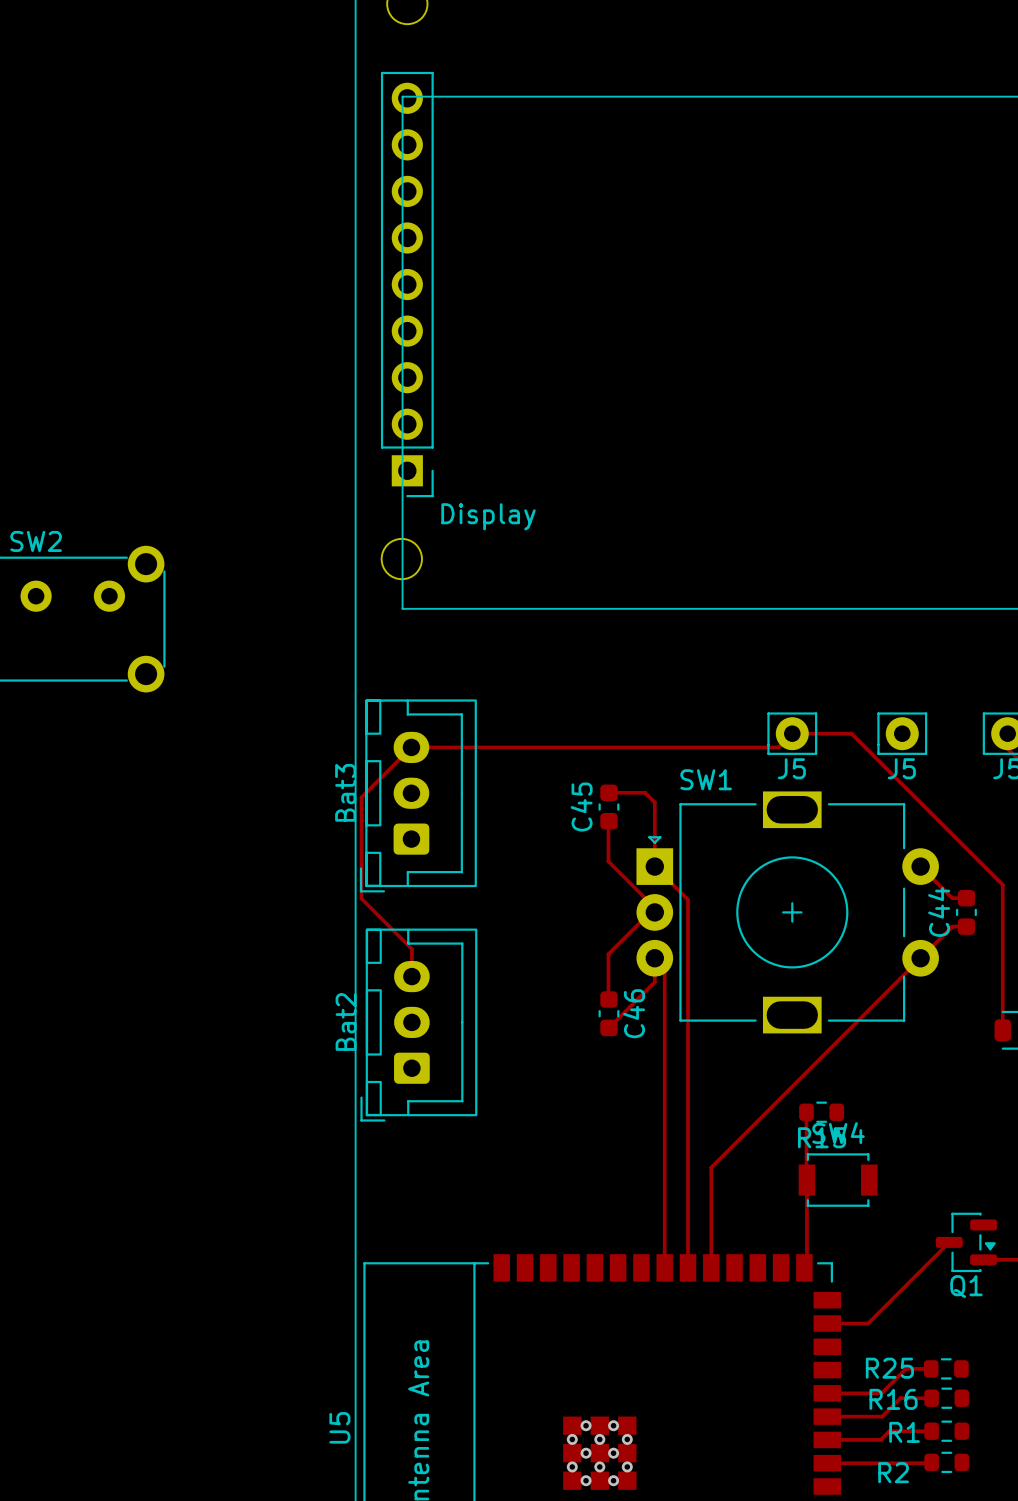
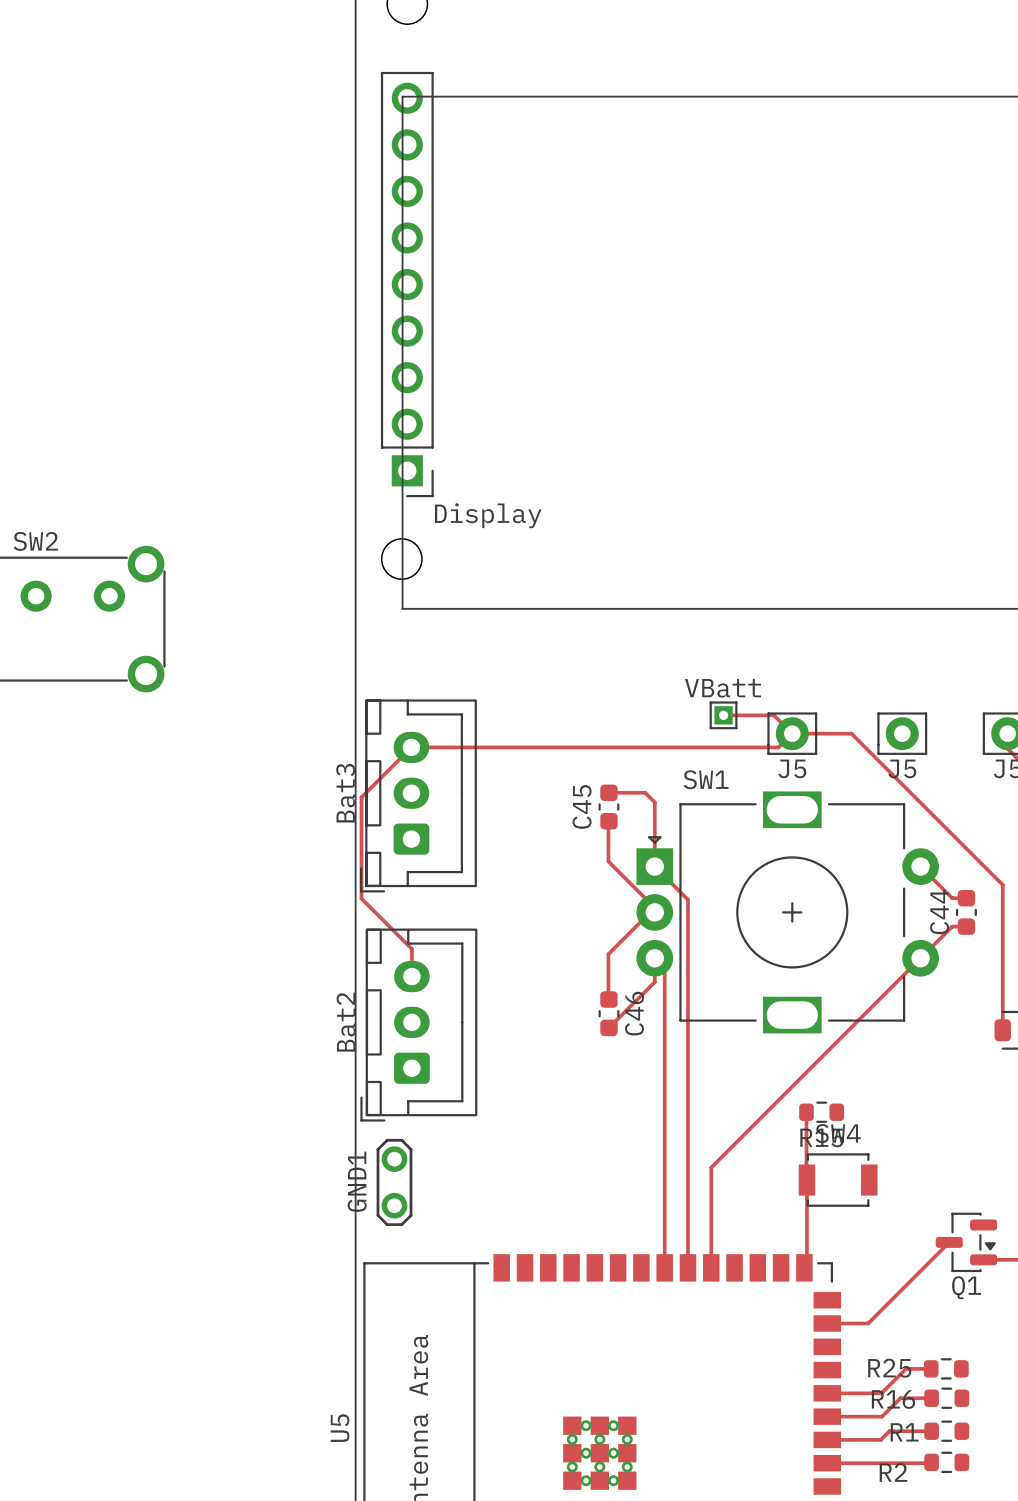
track: none -> (723, 715) (773, 715) (792, 733)
VBatt: none -> (723, 715)
GND1: none -> (394, 1182)

